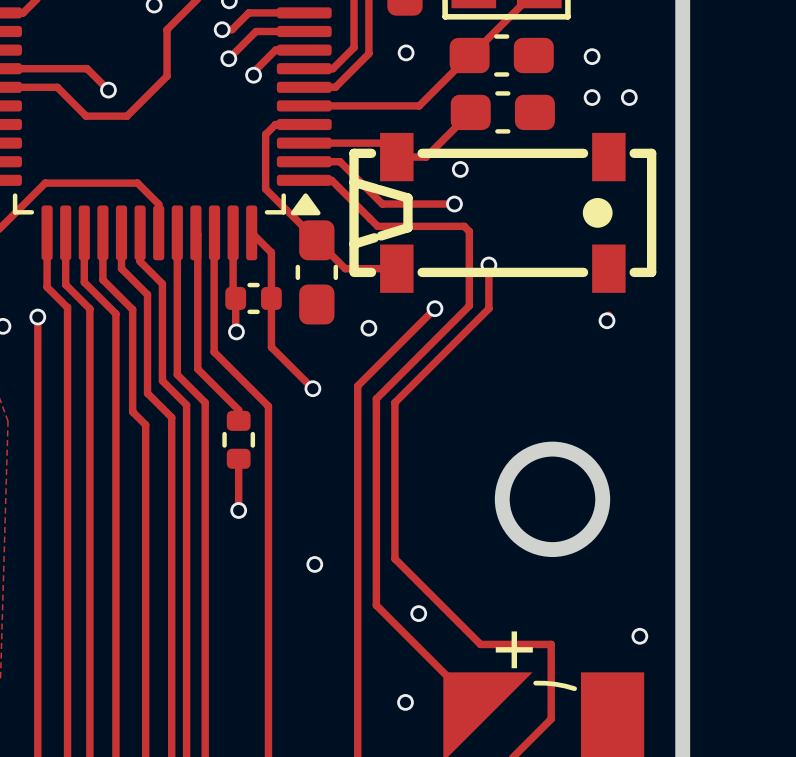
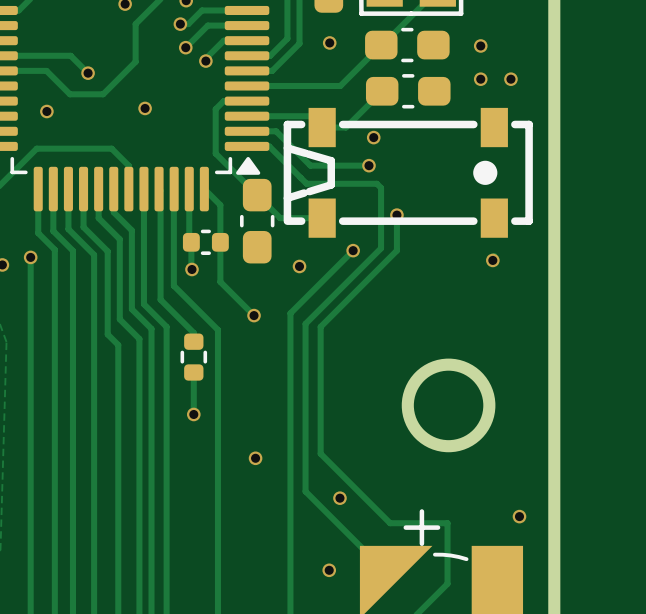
via: none -> (145, 108)
via: none -> (46, 111)

